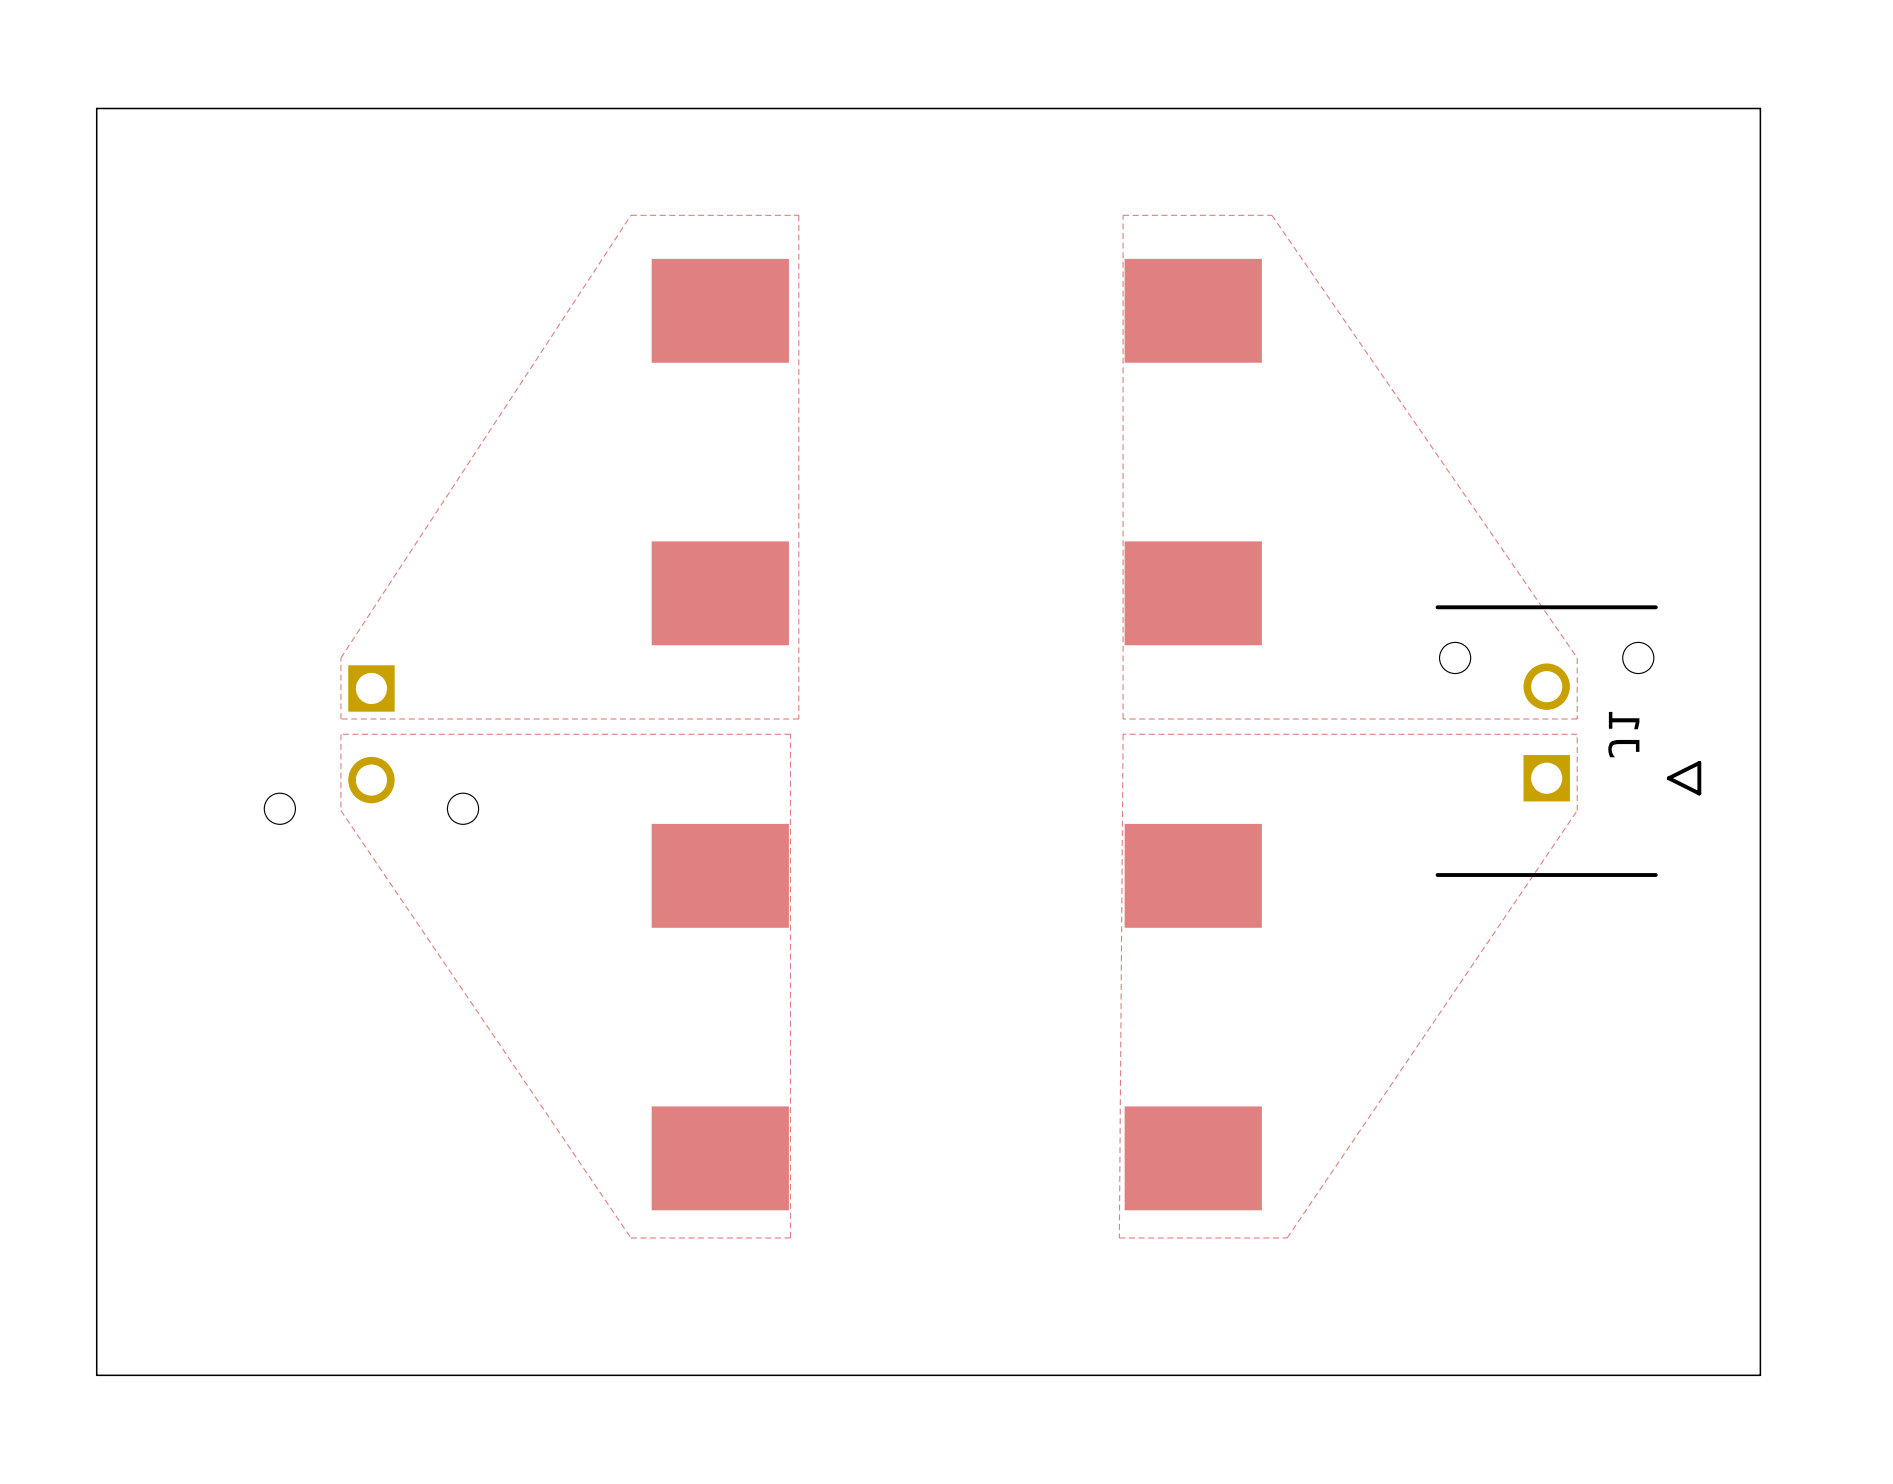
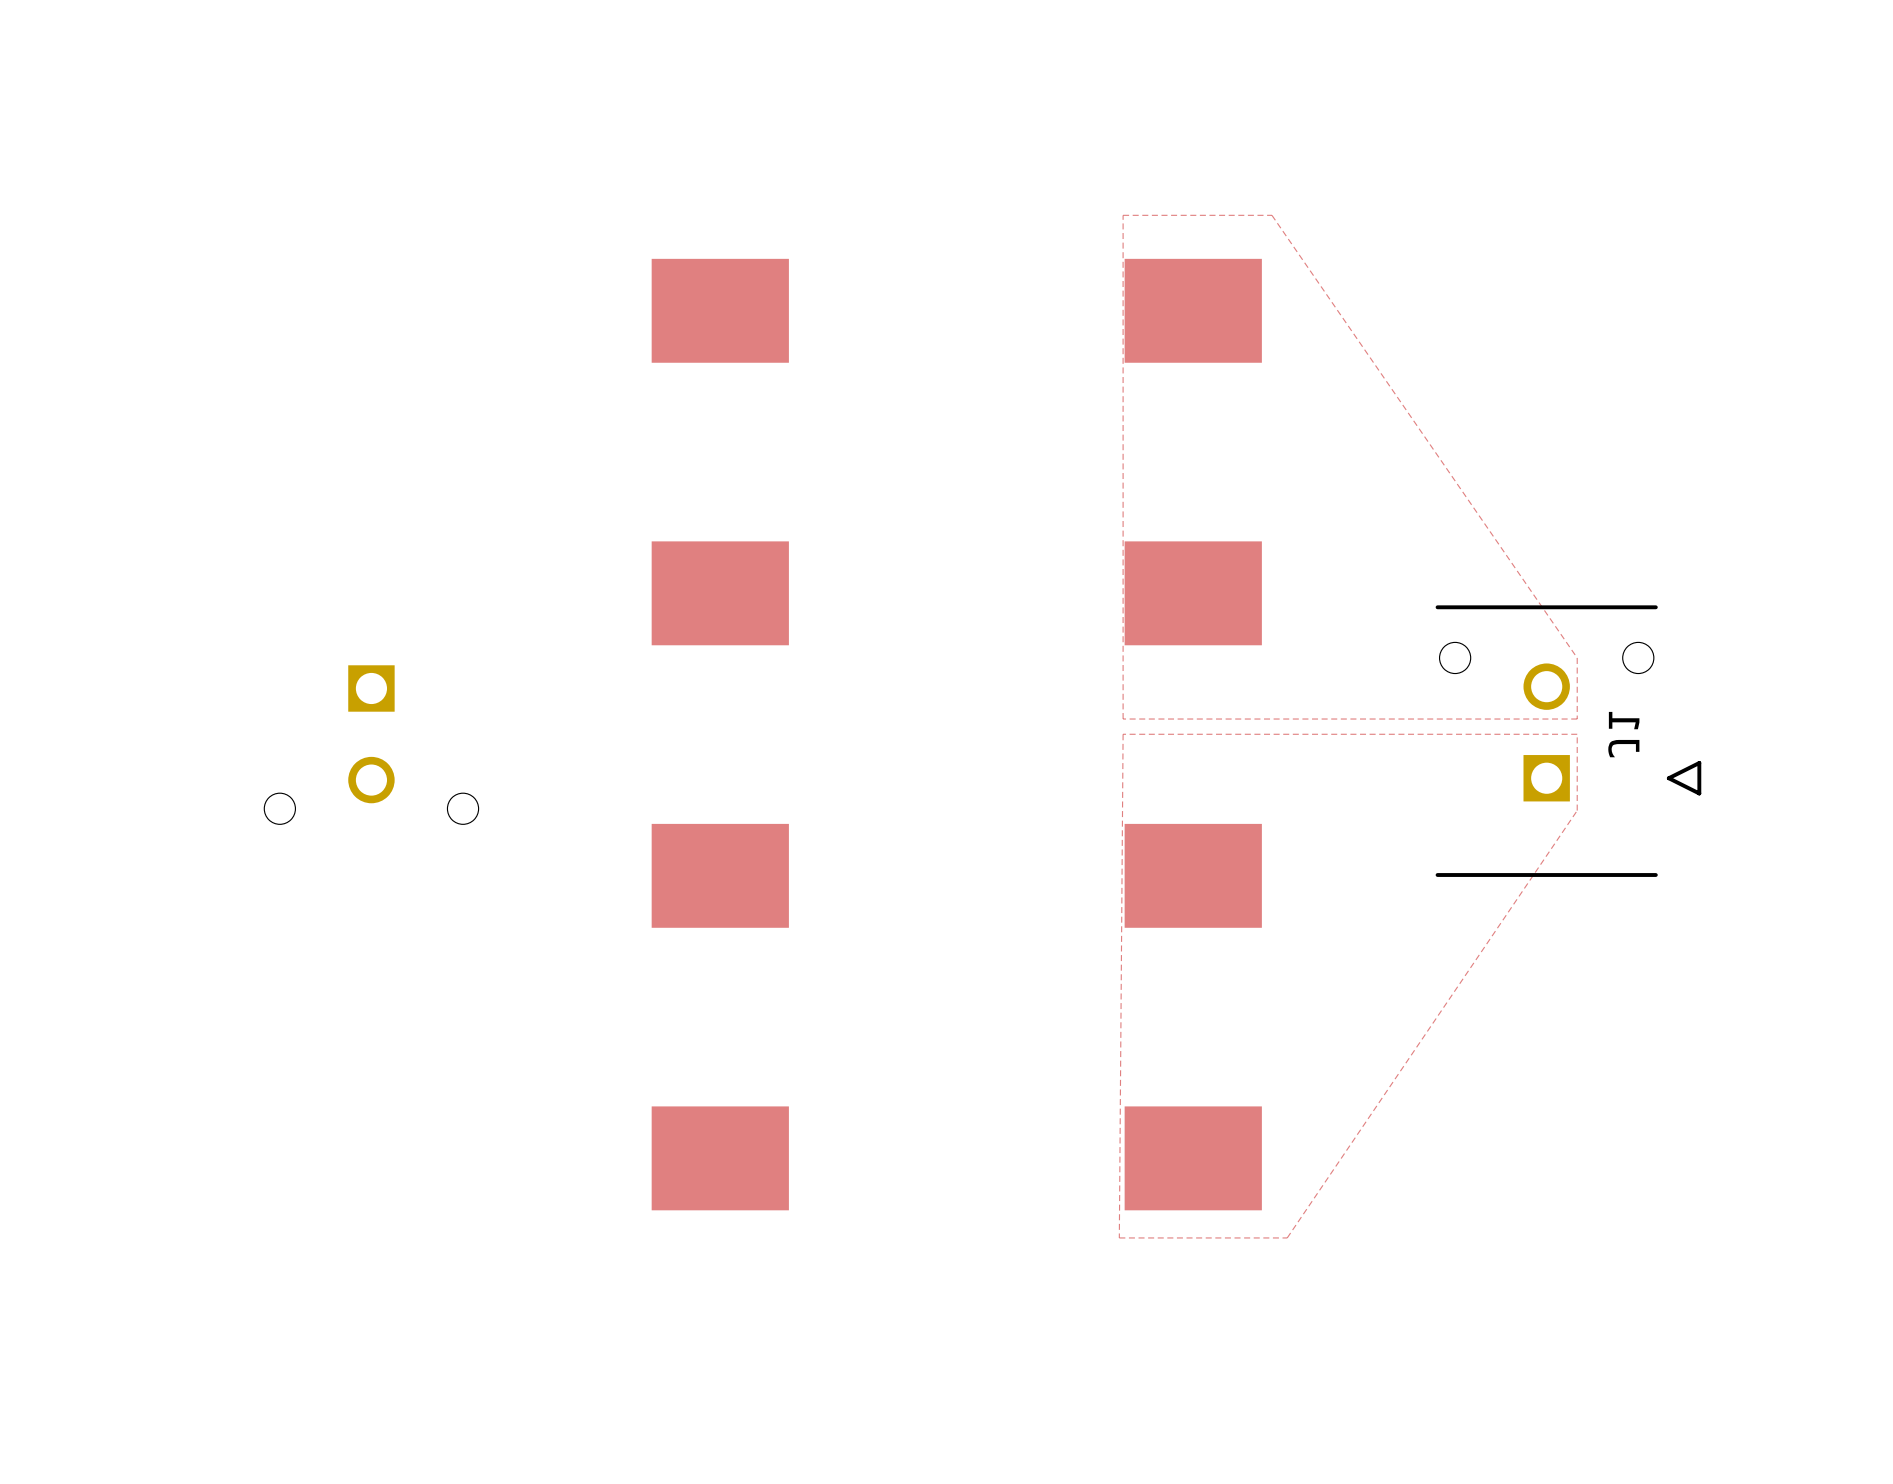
board edge: (1760, 108) (96, 108) (96, 1375) (1760, 1375) (1760, 108) -> none
top zone outline: (798, 215) (630, 215) (340, 657) (340, 719) (798, 719) (798, 215) -> none
top zone outline: (790, 734) (340, 734) (340, 810) (630, 1237) (790, 1237) (790, 734) -> none

